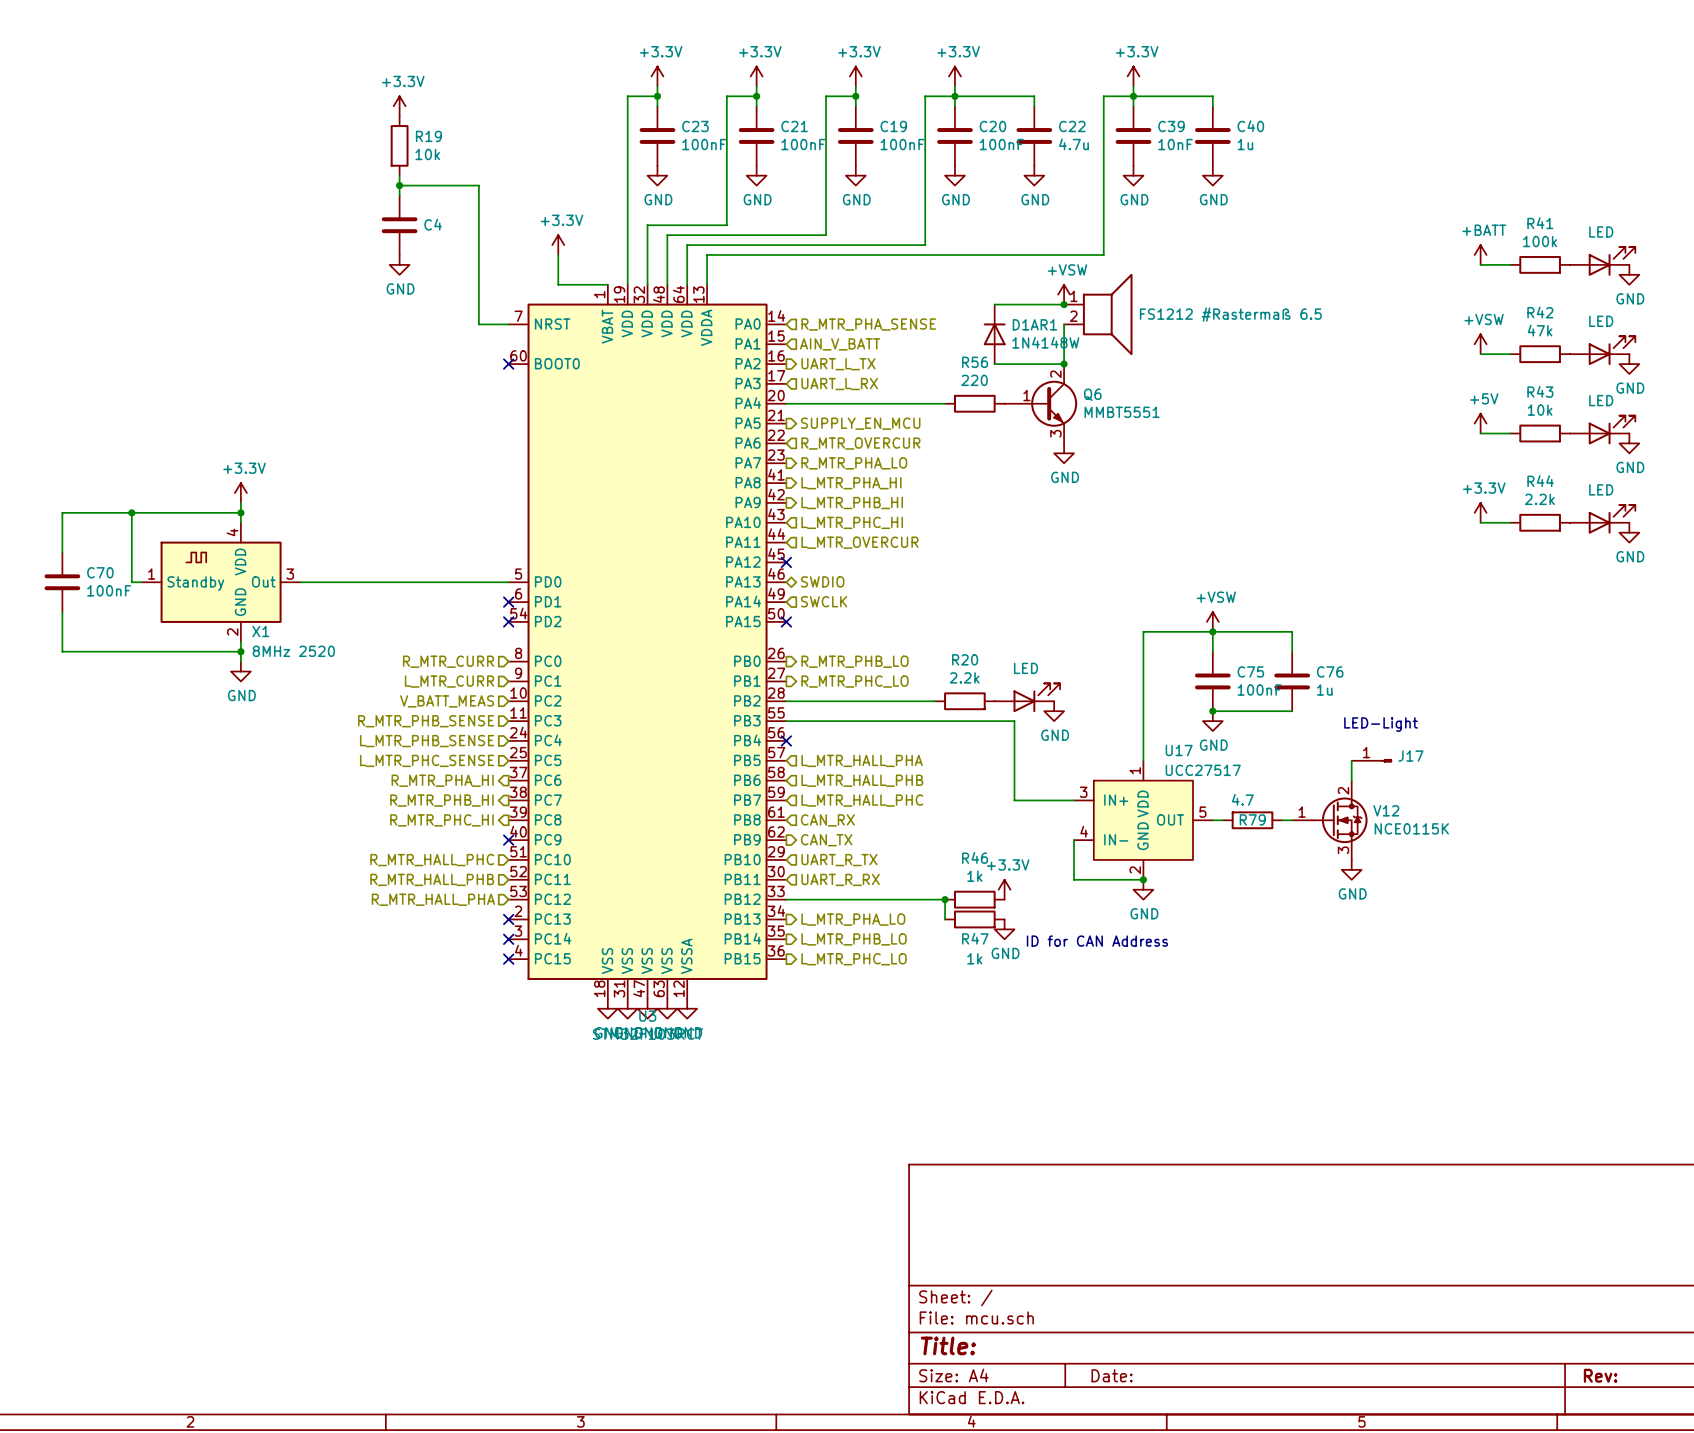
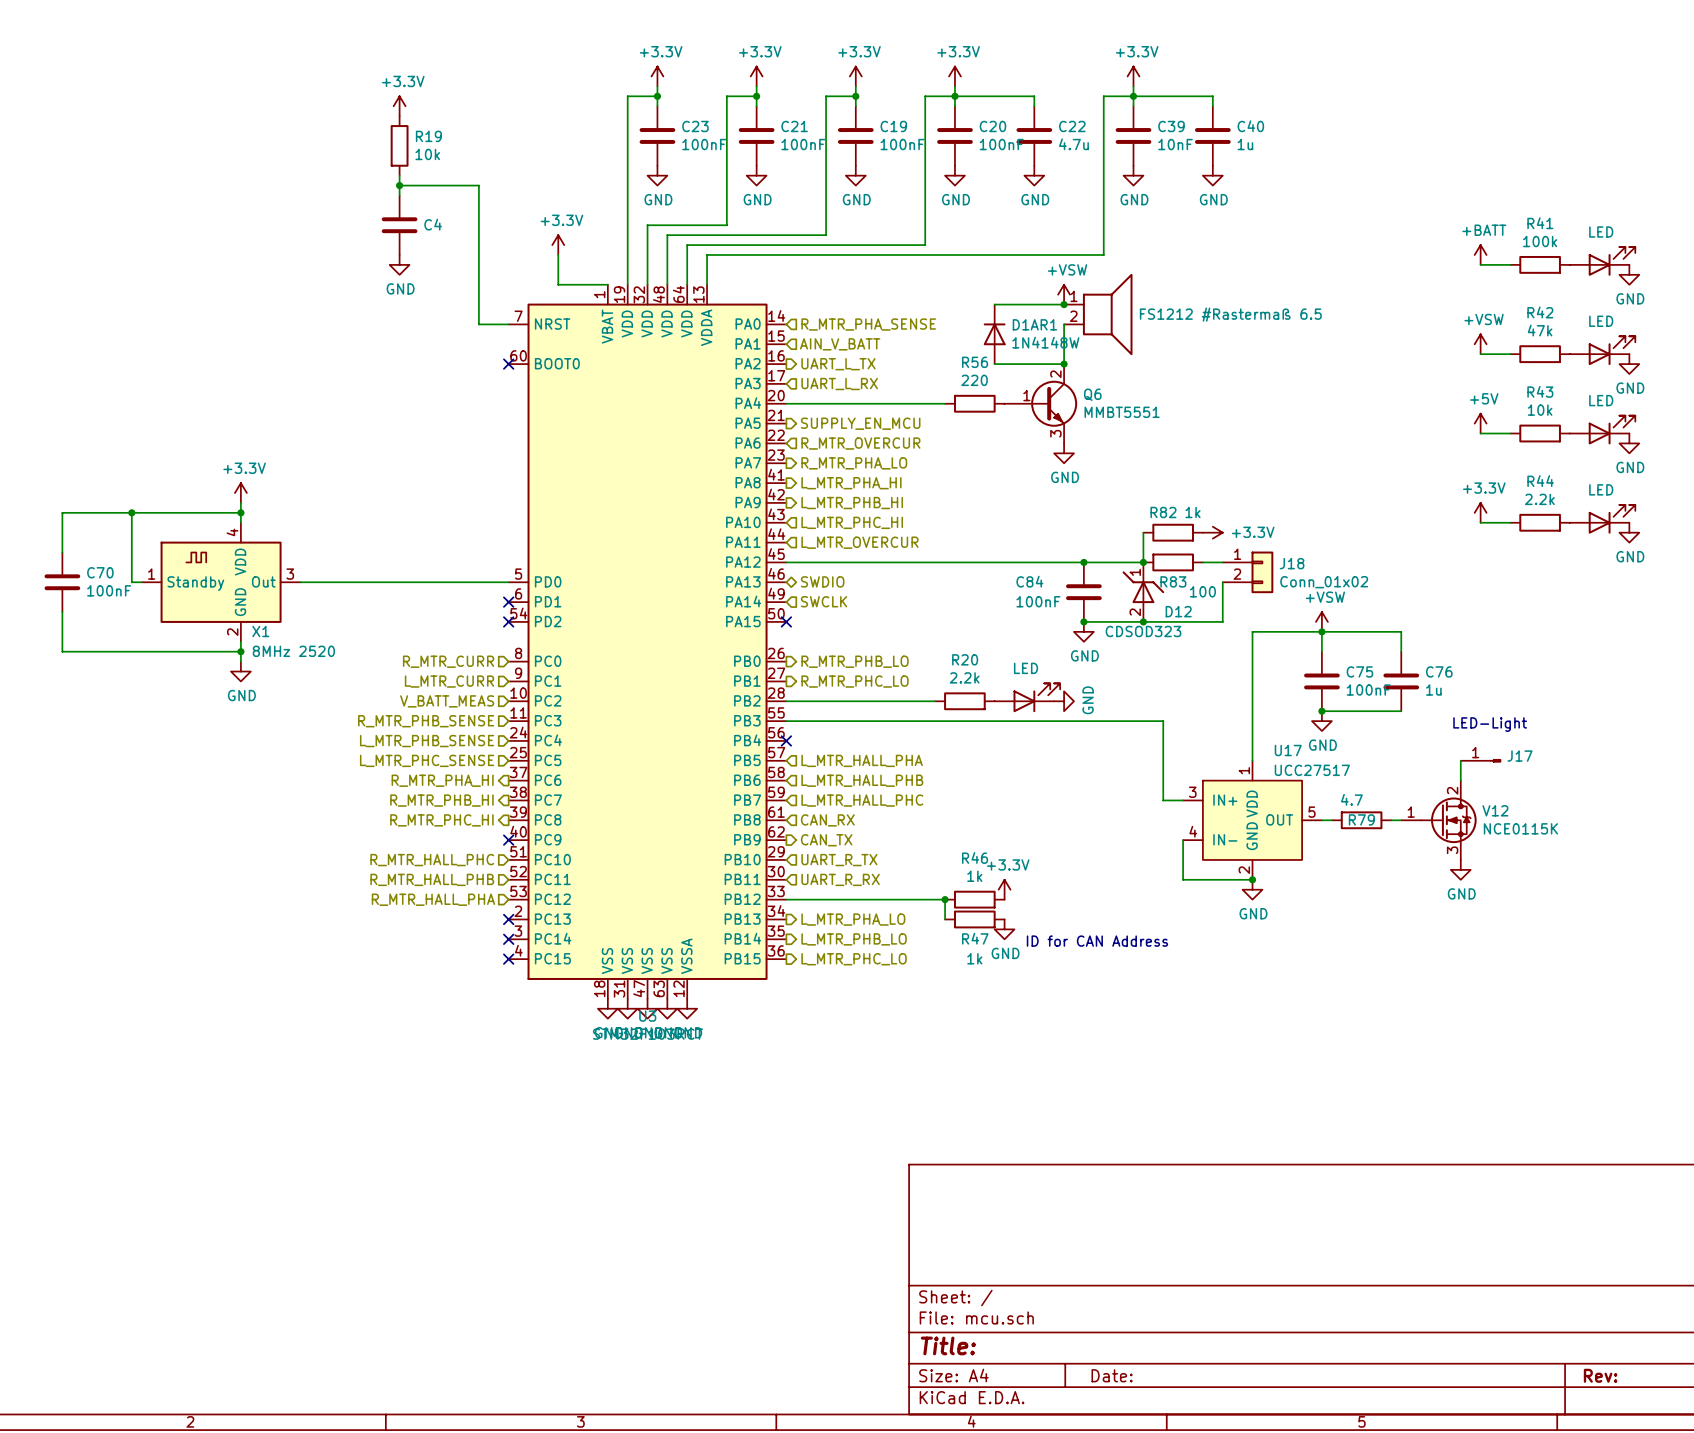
wire: none -> (1143, 532) (1143, 562) (786, 562)
R82: none -> 1k (1173, 532)
power symbol: none -> +3.3V (1212, 532)
no-connect mark: (786, 562) -> none
junction: none -> (1083, 562)
junction: none -> (1143, 562)
R83: none -> 100 (1173, 562)
wire: none -> (1202, 562) (1222, 562)
J18: none -> Conn_01x02 (1248, 572)
wire: none -> (1222, 582) (1222, 621) (1083, 621)
C84: none -> 100nF (1083, 592)
D12: none -> CDSOD323 (1143, 592)
junction: none -> (1083, 621)
junction: none -> (1143, 621)
power symbol position: +VSW (1212, 621) -> +VSW (1321, 621)
power symbol: none -> GND (1083, 631)
wire: (1212, 631) (1212, 651) -> (1321, 631) (1321, 651)
junction: (1212, 631) -> none
wire: (1252, 631) (1143, 631) (1143, 760) -> (1252, 631) (1252, 760)
wire: (1292, 631) (1292, 651) -> (1292, 631) (1401, 631) (1401, 651)
junction: none -> (1321, 631)
C75 position: (1212, 681) -> (1321, 681)
C76 position: (1292, 681) -> (1401, 681)
power symbol rotation: 0° (1054, 711) -> 90° counterclockwise (1064, 701)
power symbol position: GND (1054, 711) -> GND (1064, 701)
wire: (1212, 711) (1292, 711) -> (1321, 711) (1401, 711)
junction: (1212, 711) -> none
junction: none -> (1321, 711)
wire: (1014, 721) (1014, 800) (1073, 800) -> (1014, 721) (1163, 721) (1163, 800) (1183, 800)
power symbol: GND (1212, 721) -> none
power symbol: none -> GND (1321, 721)
text position: LED-Light (1381, 724) -> LED-Light (1490, 724)
wire: (1351, 760) (1351, 780) -> (1460, 760) (1460, 780)
J17 position: (1371, 760) -> (1480, 760)
U17 position: (1143, 820) -> (1252, 820)
R79 position: (1252, 820) -> (1361, 820)
V12 position: (1329, 820) -> (1438, 820)
wire: (1073, 840) (1073, 879) (1143, 879) -> (1183, 840) (1183, 879) (1252, 879)
power symbol: GND (1351, 869) -> none
power symbol: none -> GND (1460, 869)
junction: (1143, 879) -> none
junction: none -> (1252, 879)
power symbol: GND (1143, 889) -> none
power symbol: none -> GND (1252, 889)

